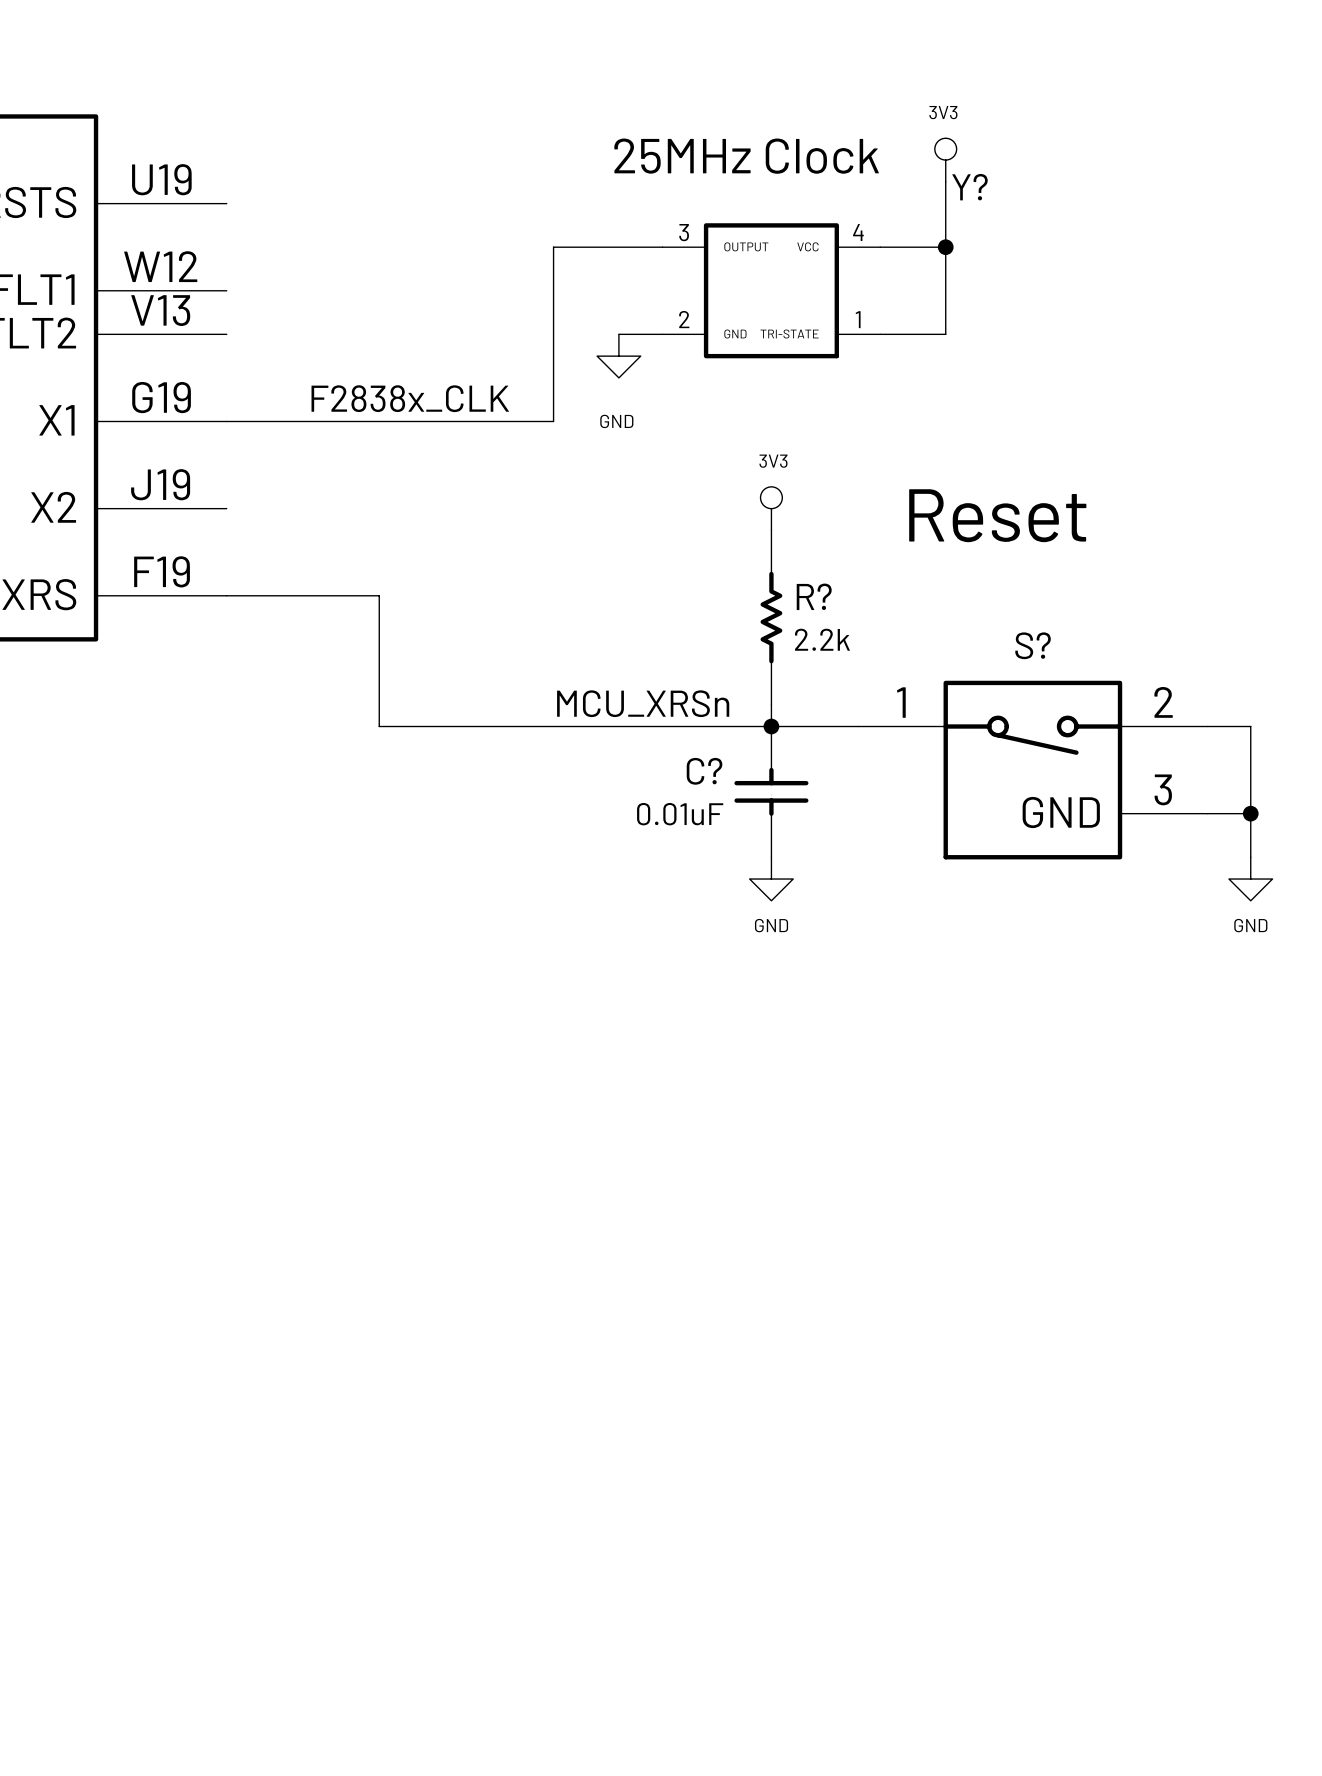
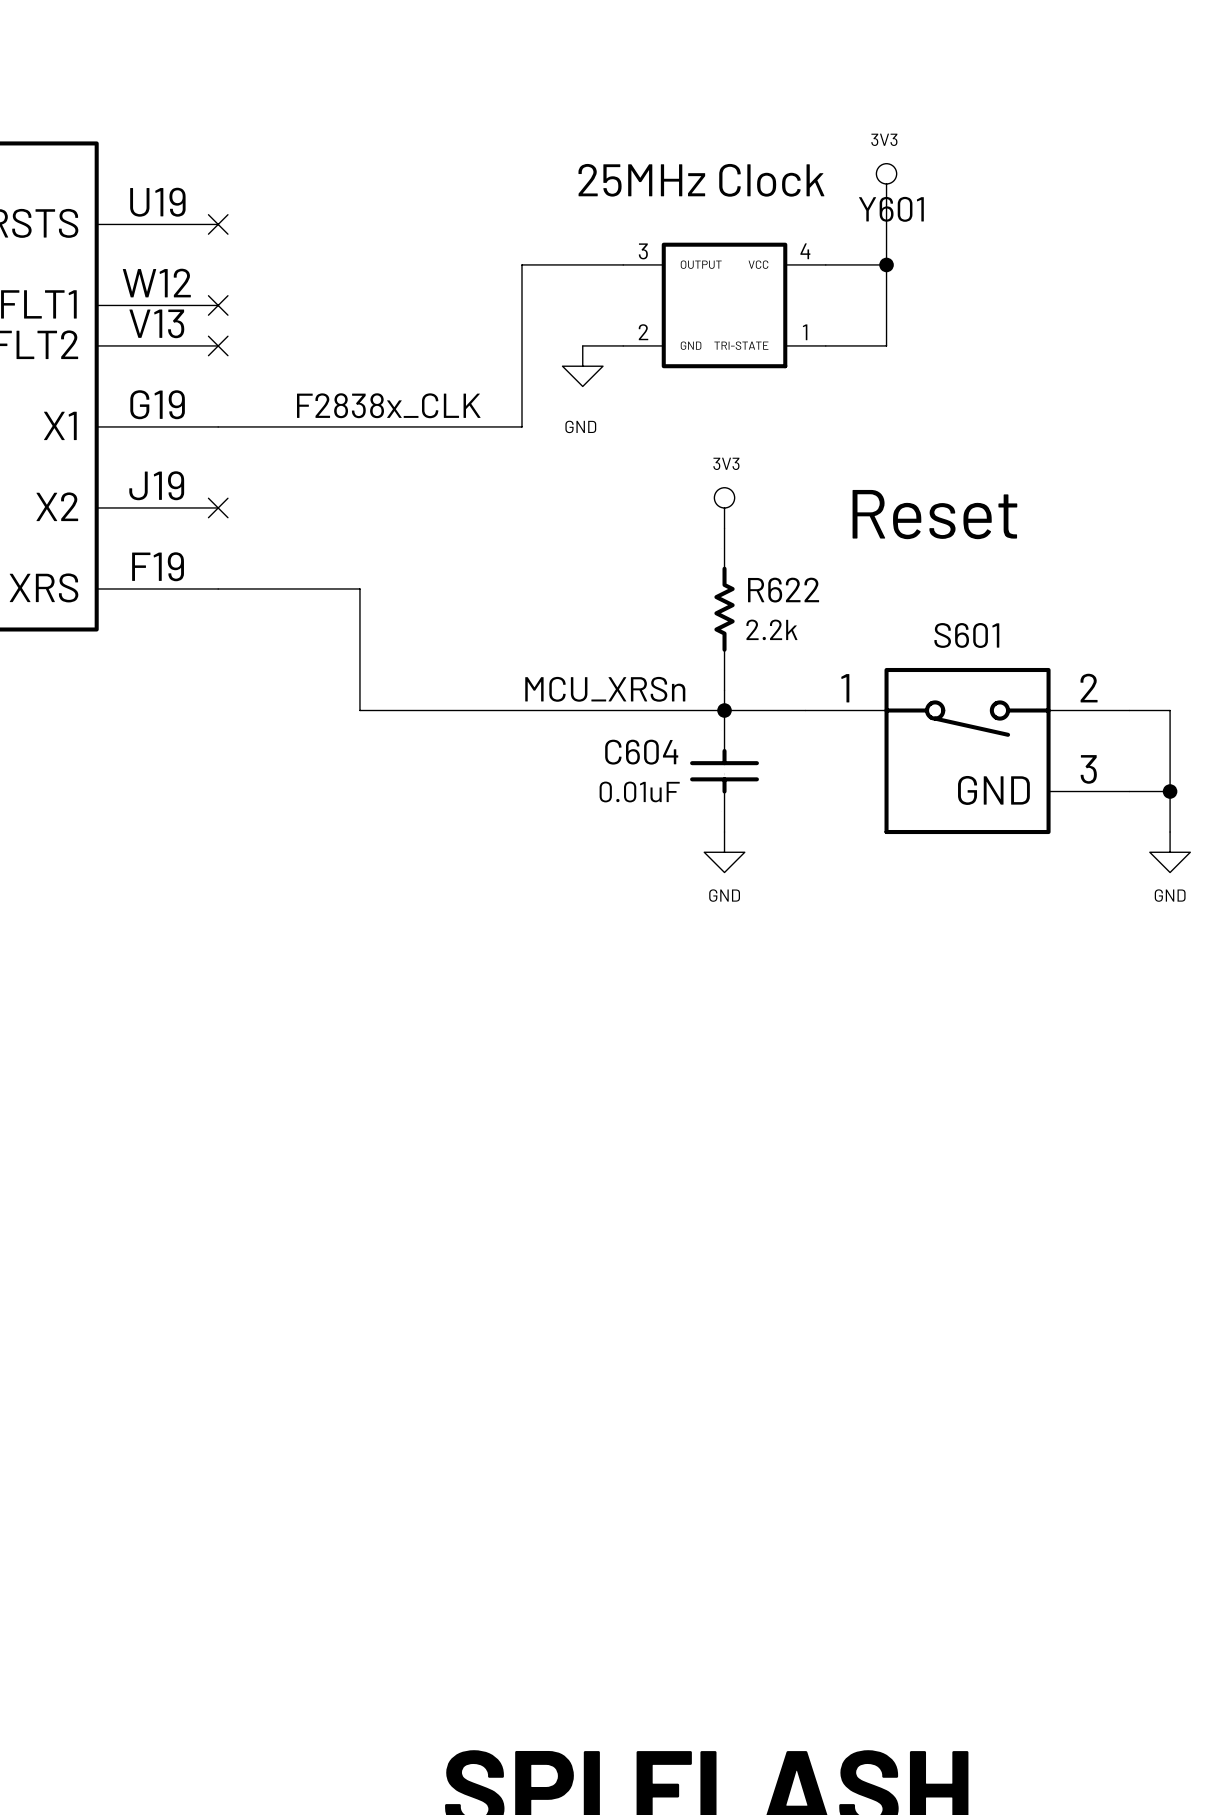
Y? name: Y? (969, 187) -> Y601 (891, 209)
no-connect mark: none -> (218, 224)
no-connect mark: none -> (218, 305)
no-connect mark: none -> (218, 345)
no-connect mark: none -> (218, 507)
R? name: R? (814, 596) -> R622 (783, 590)
S? name: S? (1033, 645) -> S601 (966, 635)
C? name: C? (704, 771) -> C604 (641, 752)

